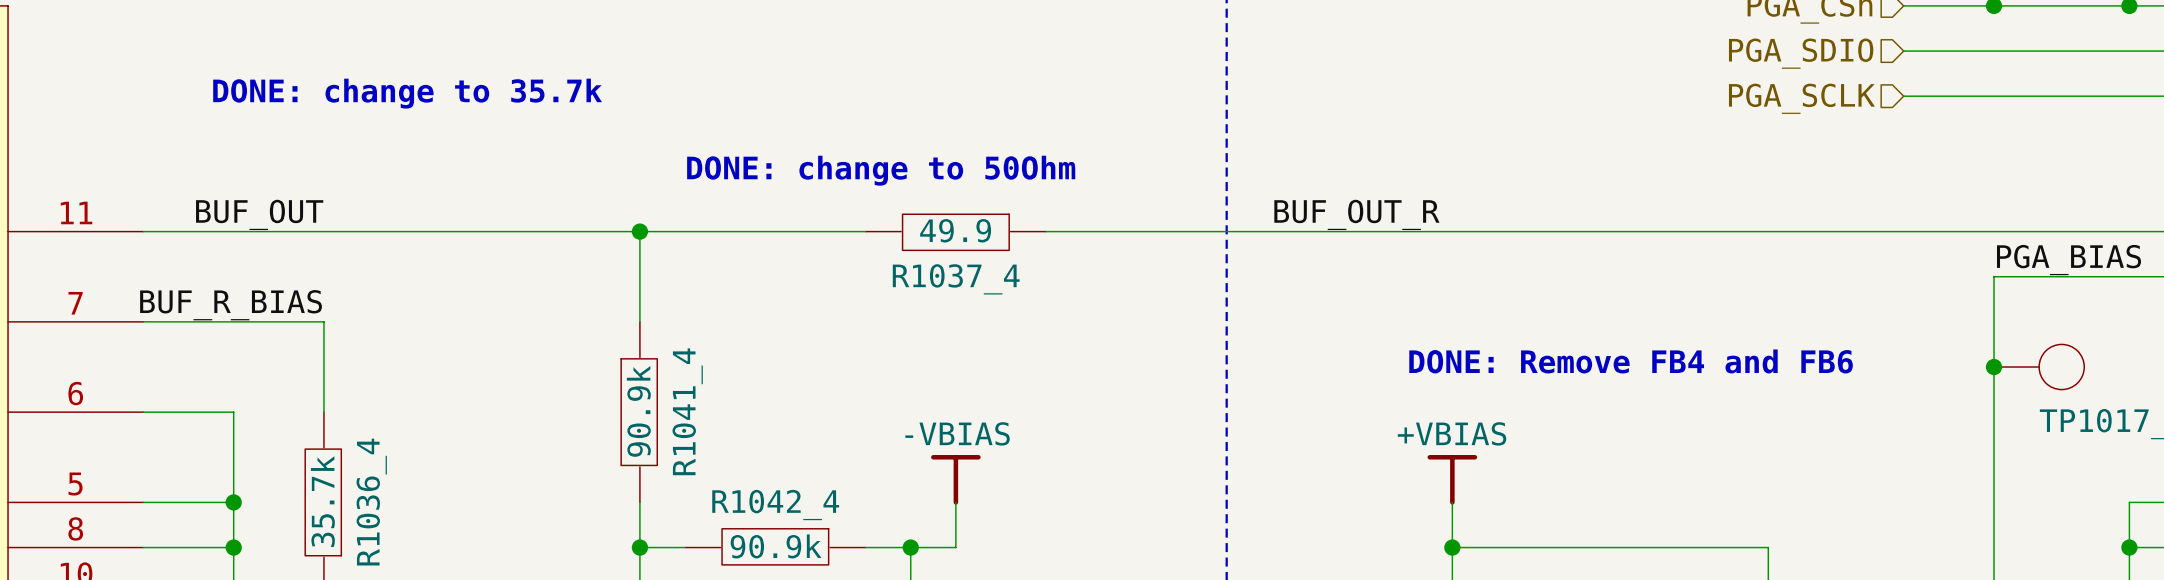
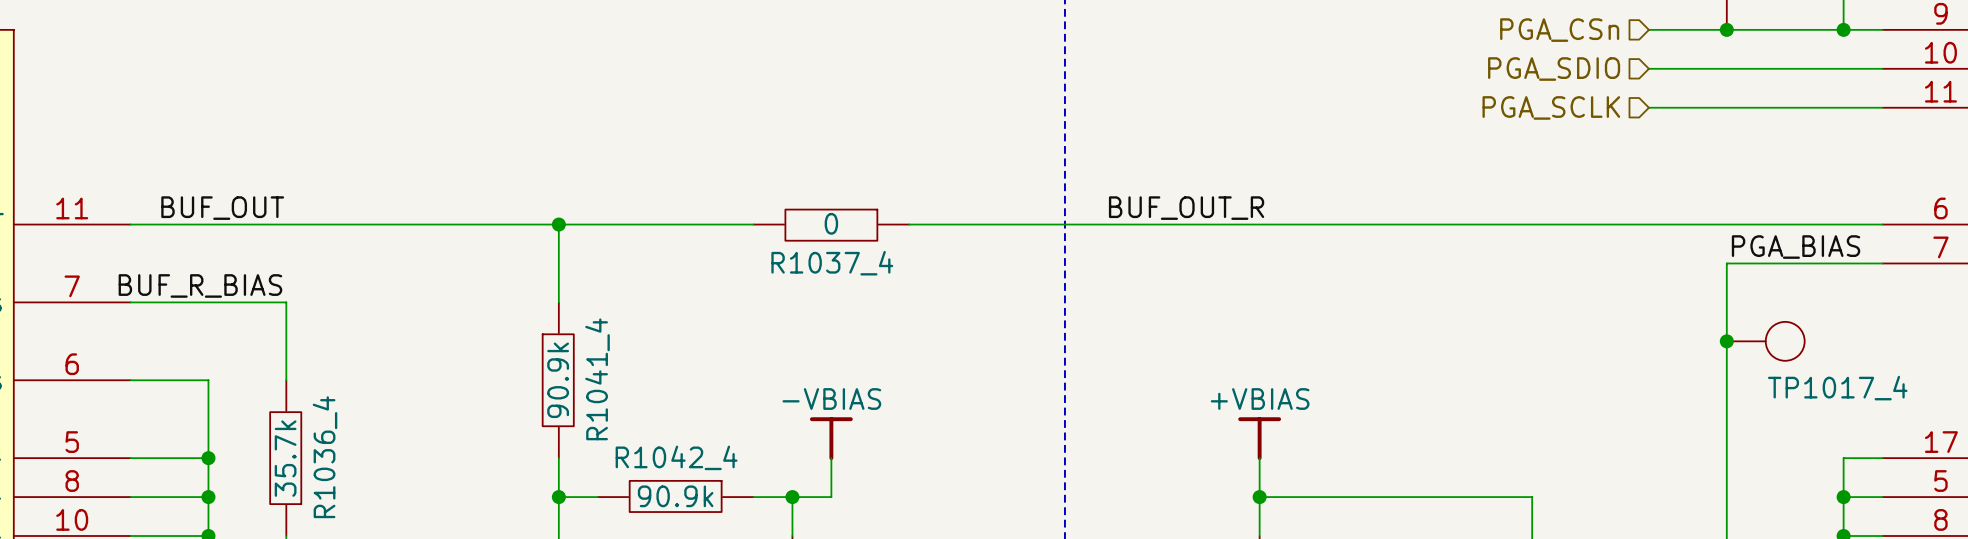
text: DONE: change to 35.7k (407, 93) -> none
text: DONE: change to 50Ohm (881, 170) -> none
R1037_4 value: 49.9 (955, 230) -> 0 (831, 223)
text: DONE: Remove FB4 and FB6 (1631, 361) -> none

